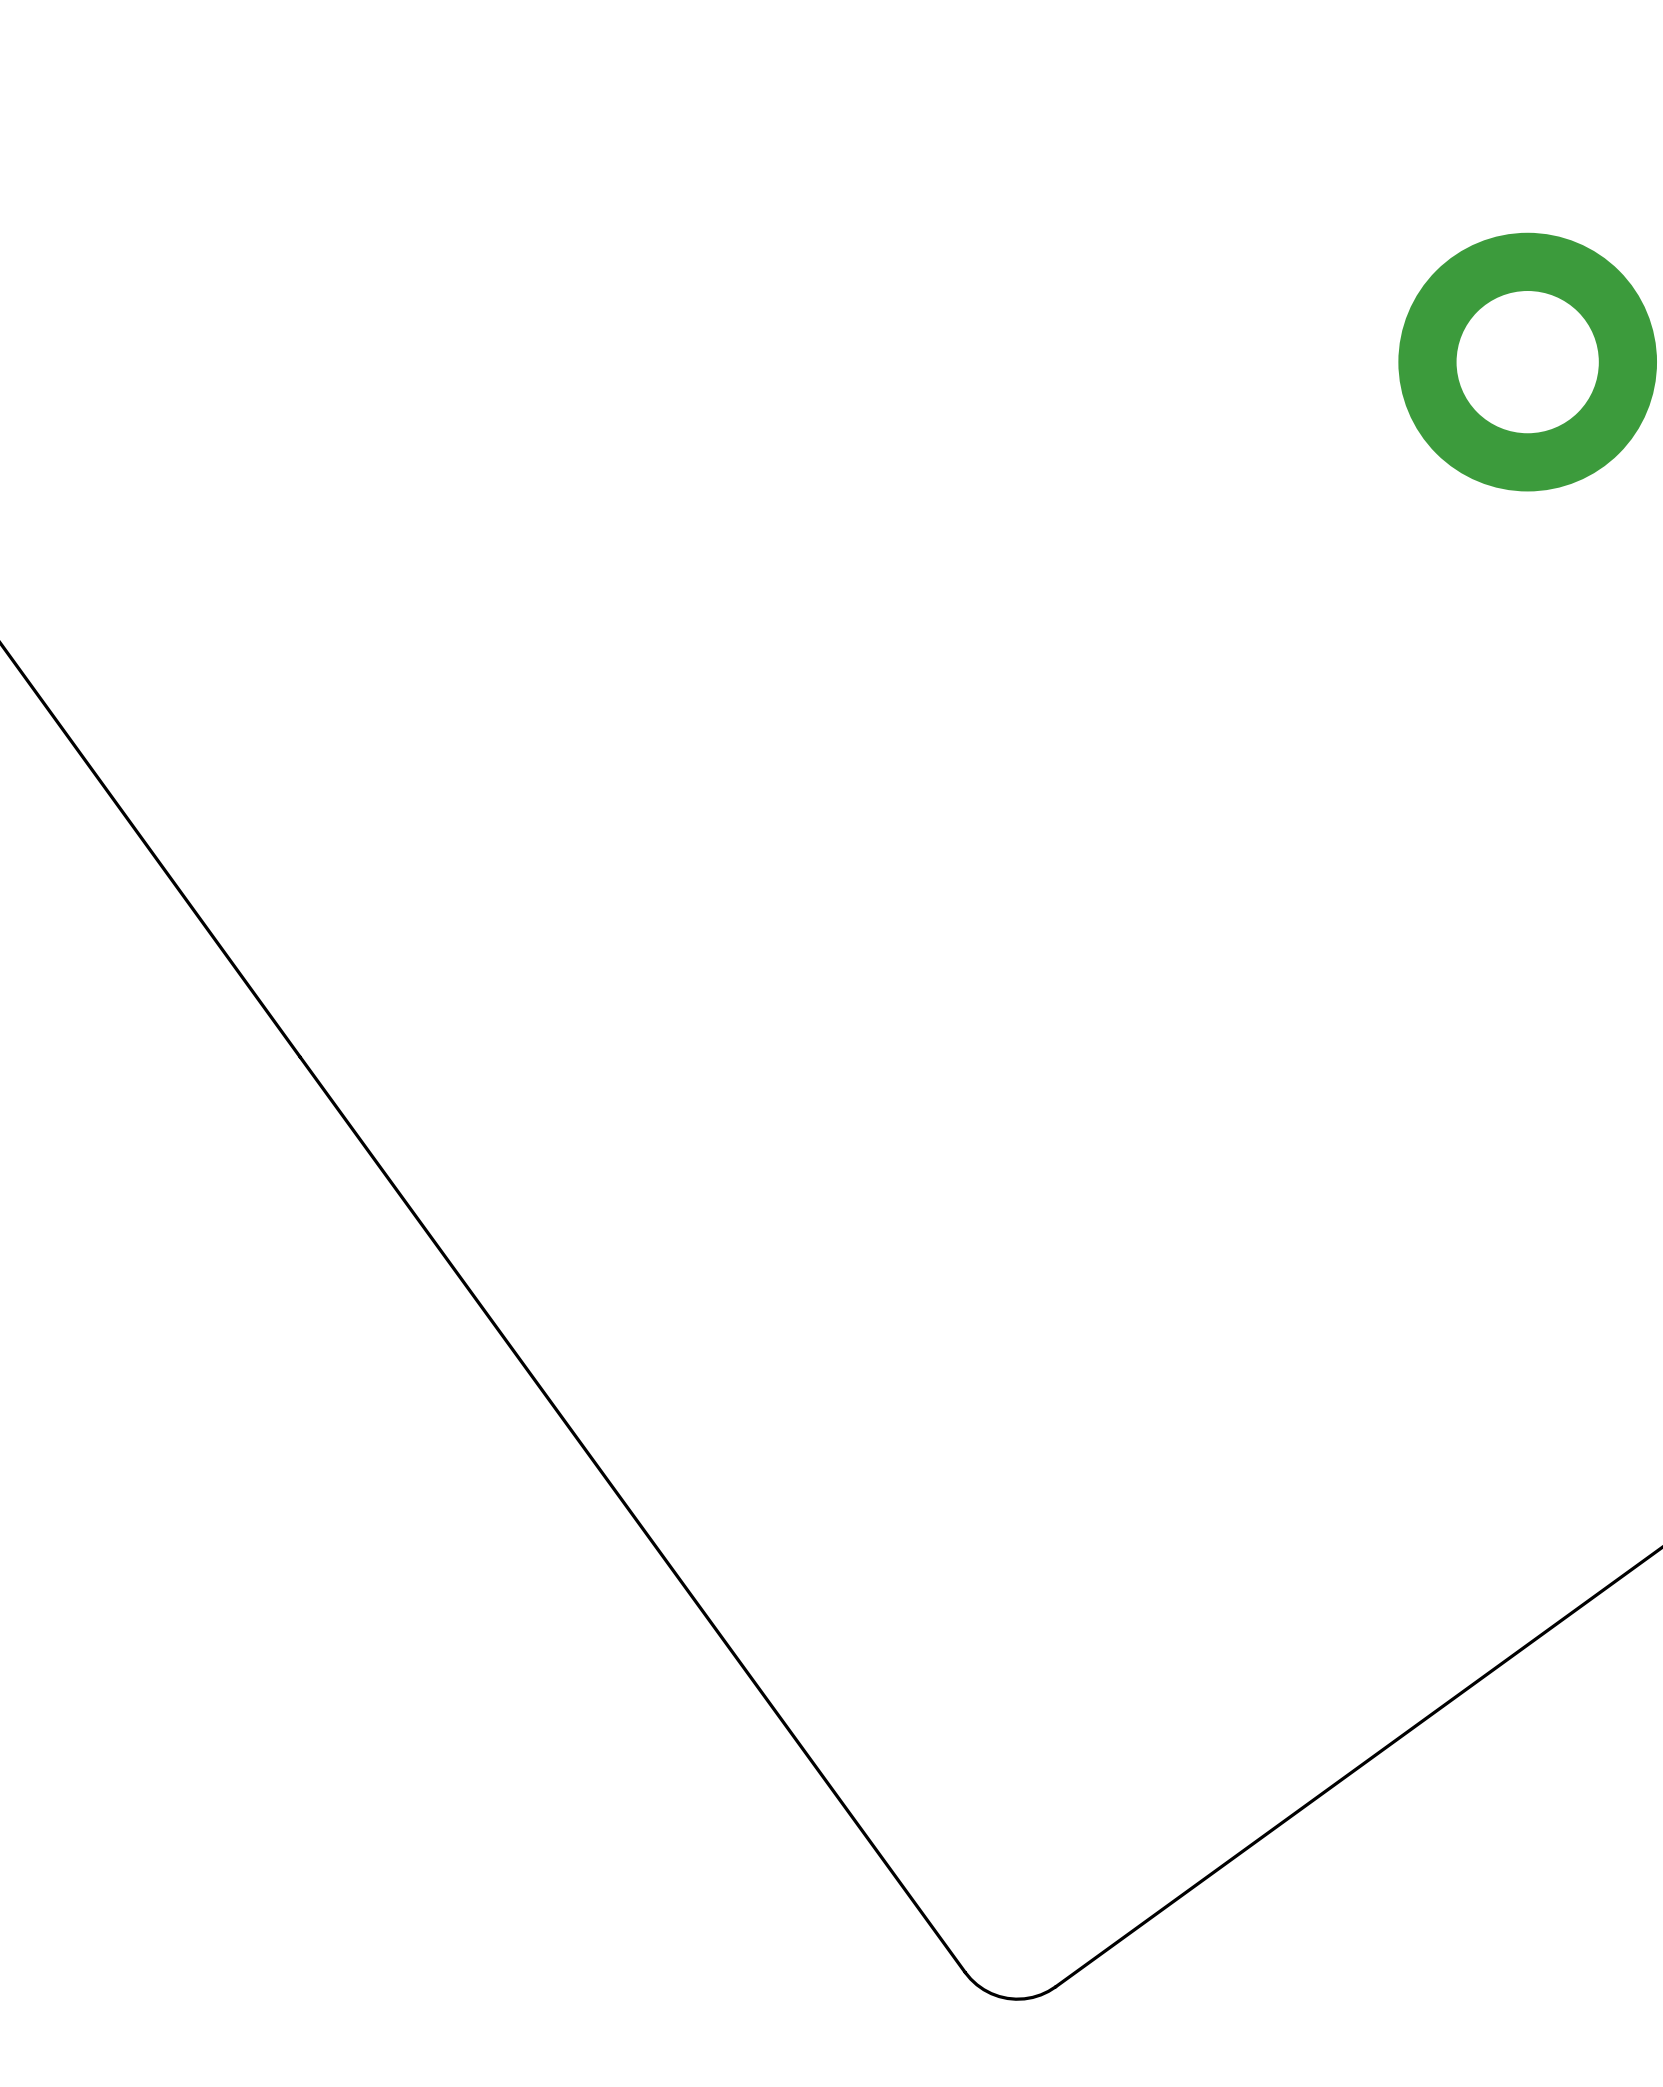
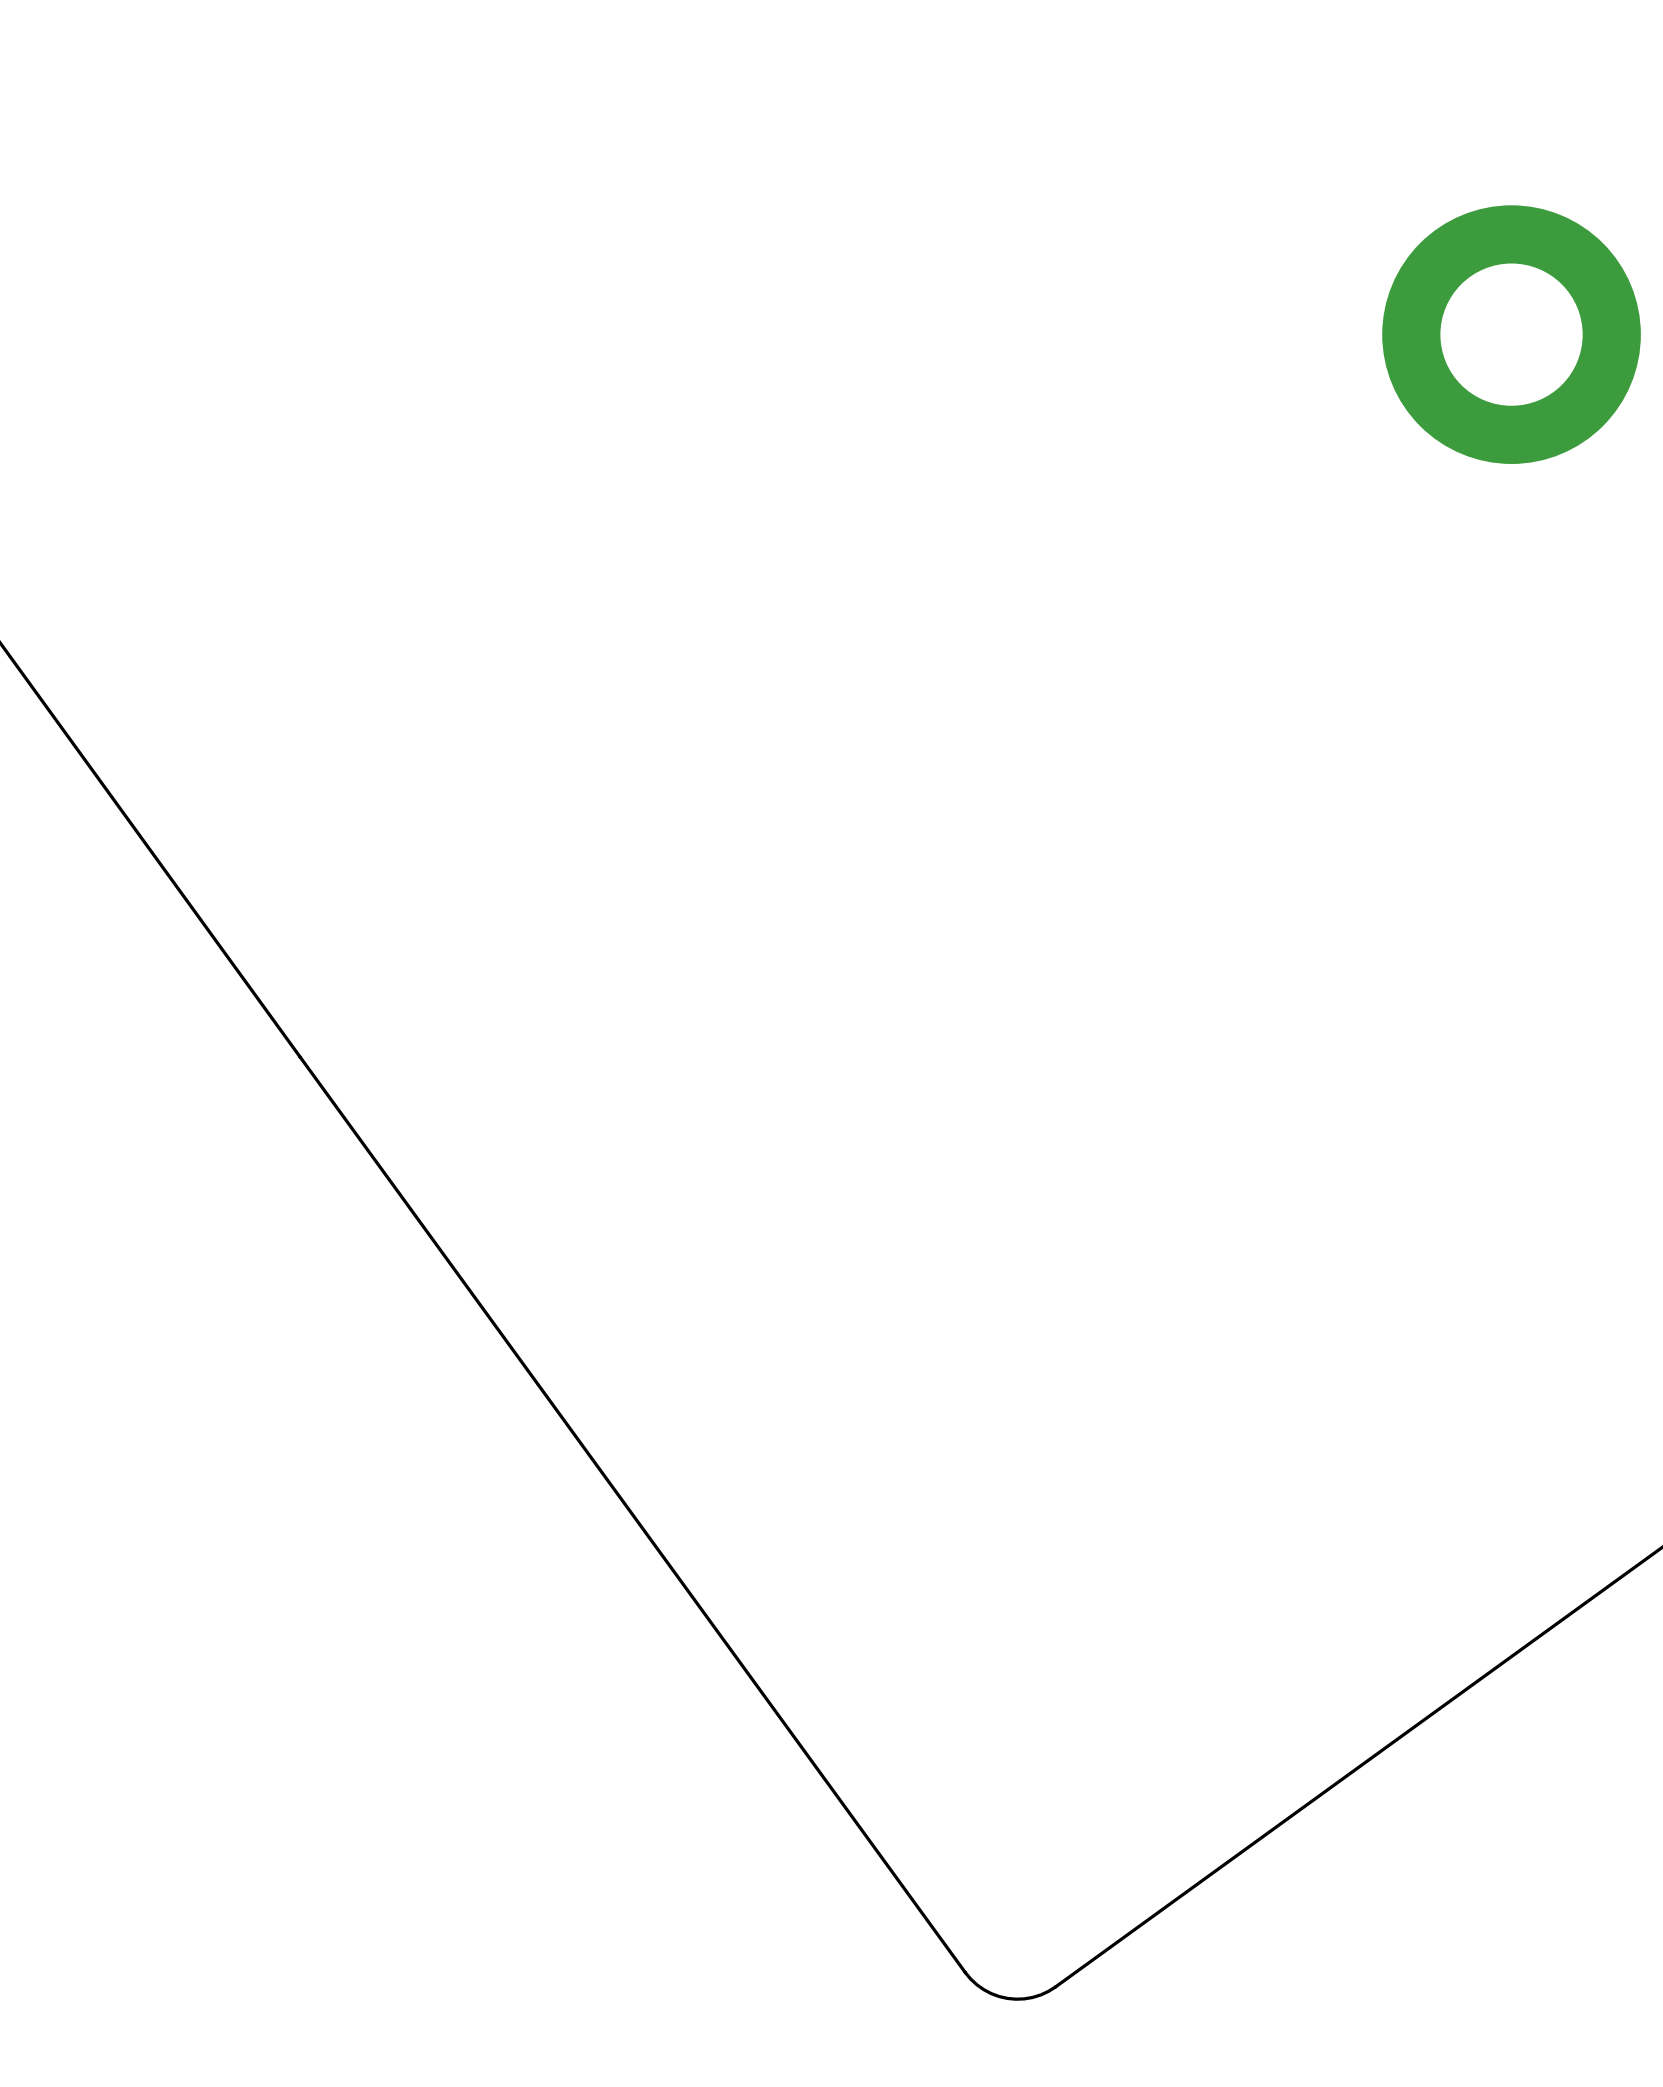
part position: (1527, 362) -> (1511, 334)

